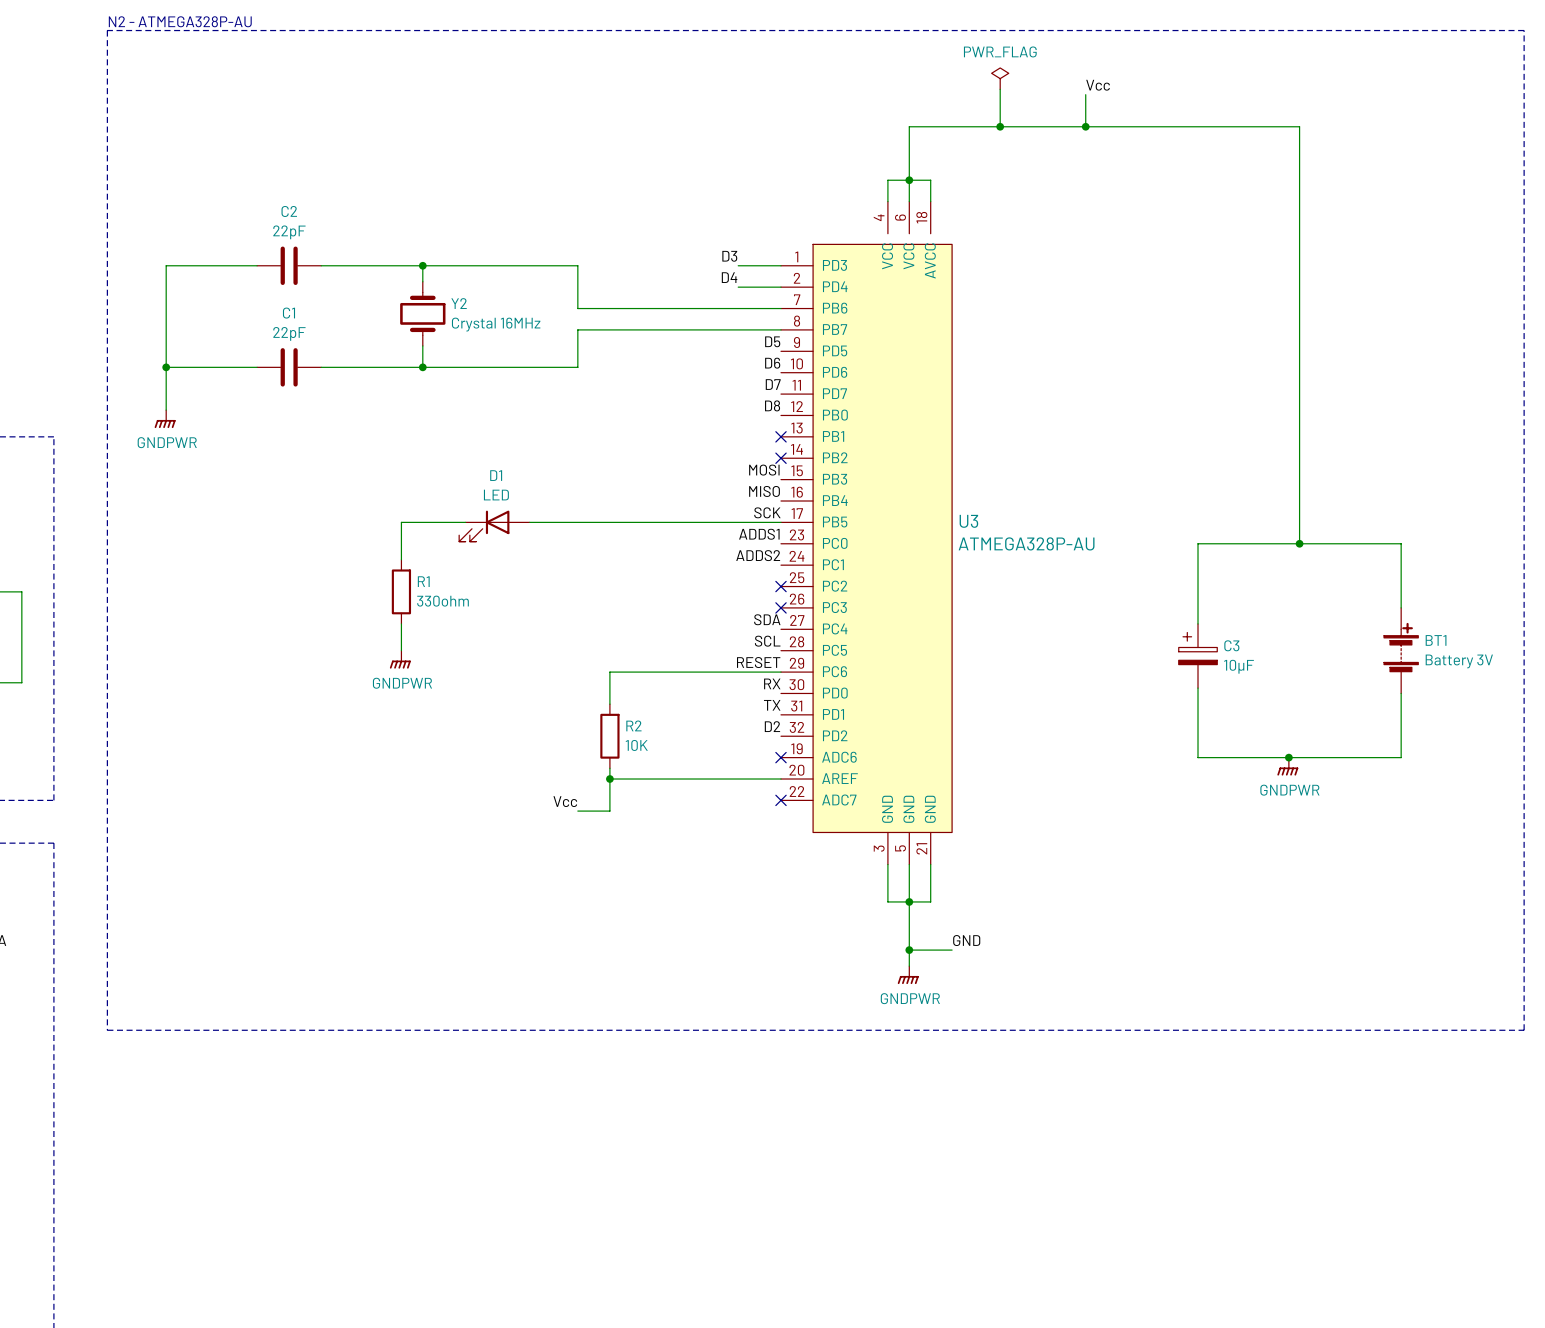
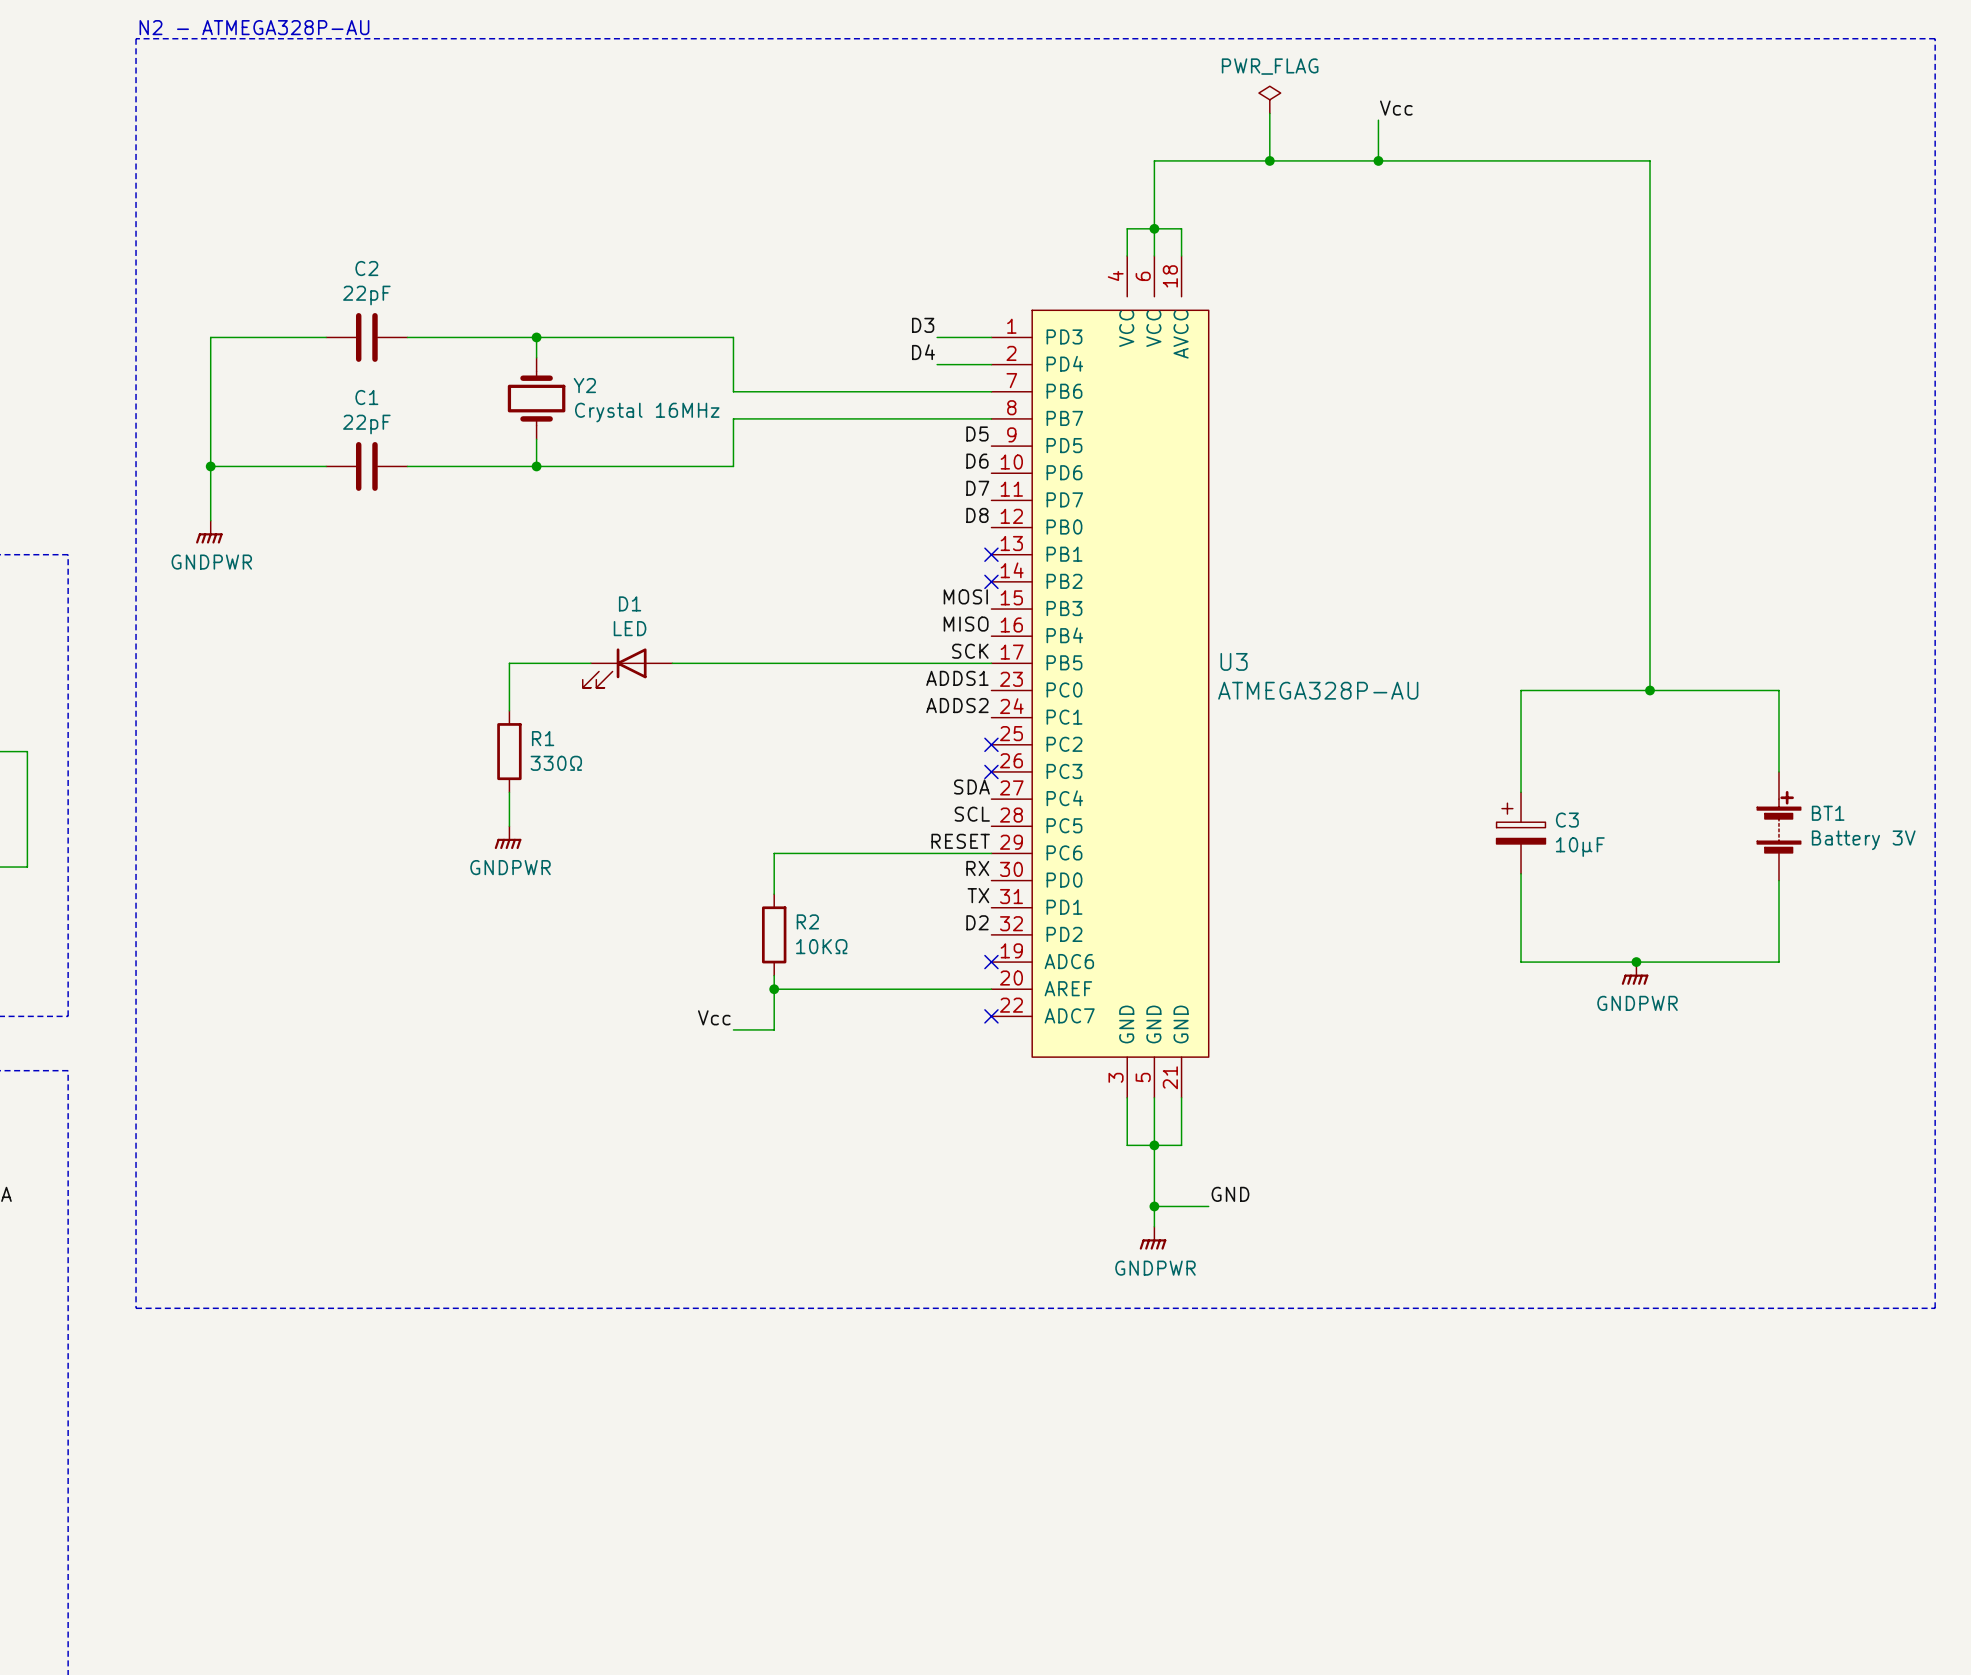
R1 value: 330ohm (442, 601) -> 330Ω (556, 763)
R2 value: 10K (636, 745) -> 10KΩ (821, 946)

